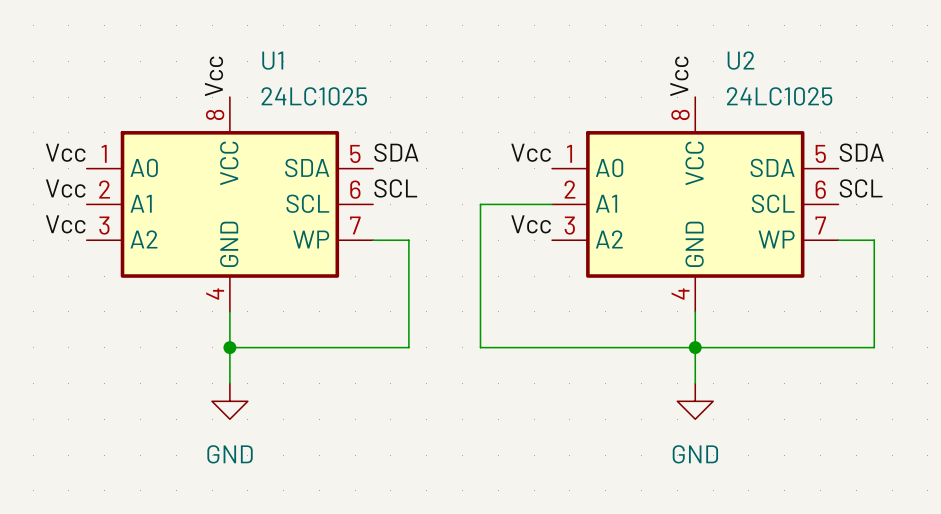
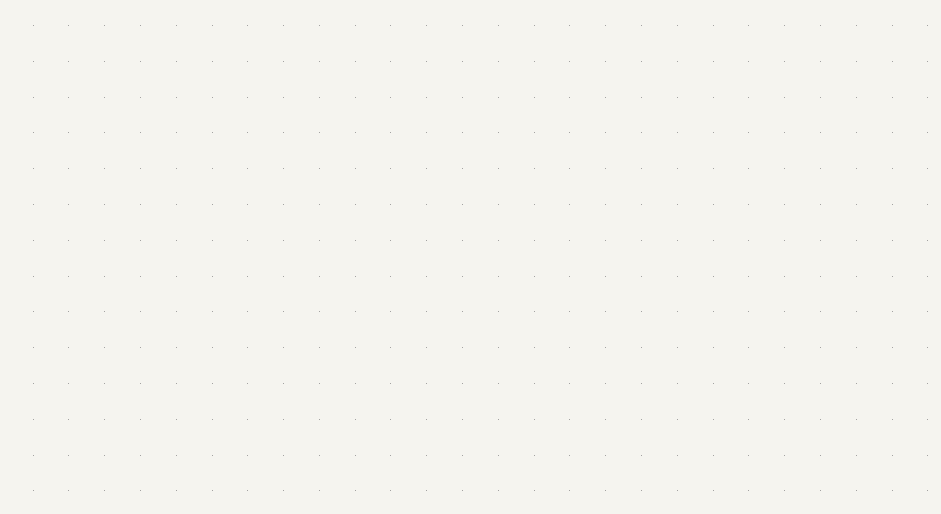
label: Vcc (214, 76) -> none
label: Vcc (679, 76) -> none
label: Vcc (65, 152) -> none
label: SDA (396, 152) -> none
label: Vcc (531, 152) -> none
label: SDA (861, 152) -> none
label: Vcc (65, 188) -> none
label: SCL (395, 188) -> none
label: SCL (861, 188) -> none
U1: 24LC1025 (229, 204) -> none
wire: (552, 204) (480, 204) (480, 347) (874, 347) (874, 240) (838, 240) -> none
U2: 24LC1025 (695, 204) -> none
label: Vcc (65, 224) -> none
label: Vcc (531, 224) -> none
wire: (373, 240) (408, 240) (408, 347) (229, 347) -> none
wire: (229, 311) (229, 383) -> none
wire: (695, 311) (695, 383) -> none
junction: (229, 347) -> none
junction: (695, 347) -> none
power symbol: GND (229, 401) -> none
power symbol: GND (695, 401) -> none

